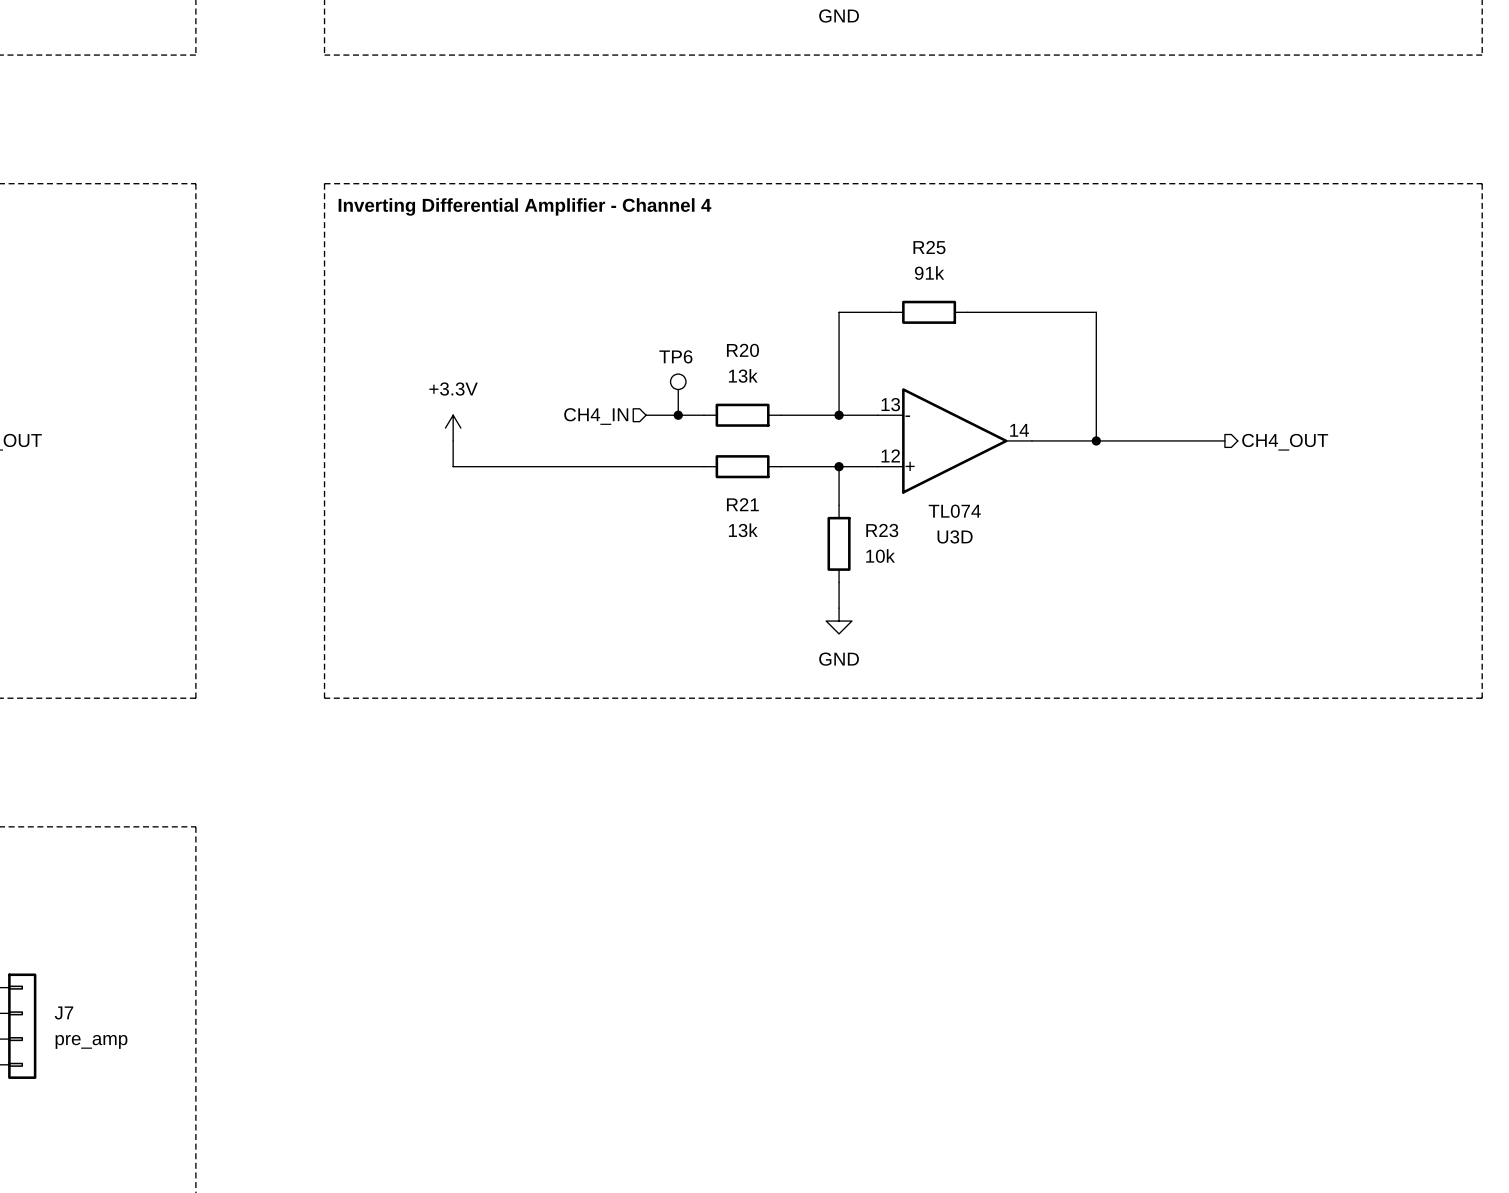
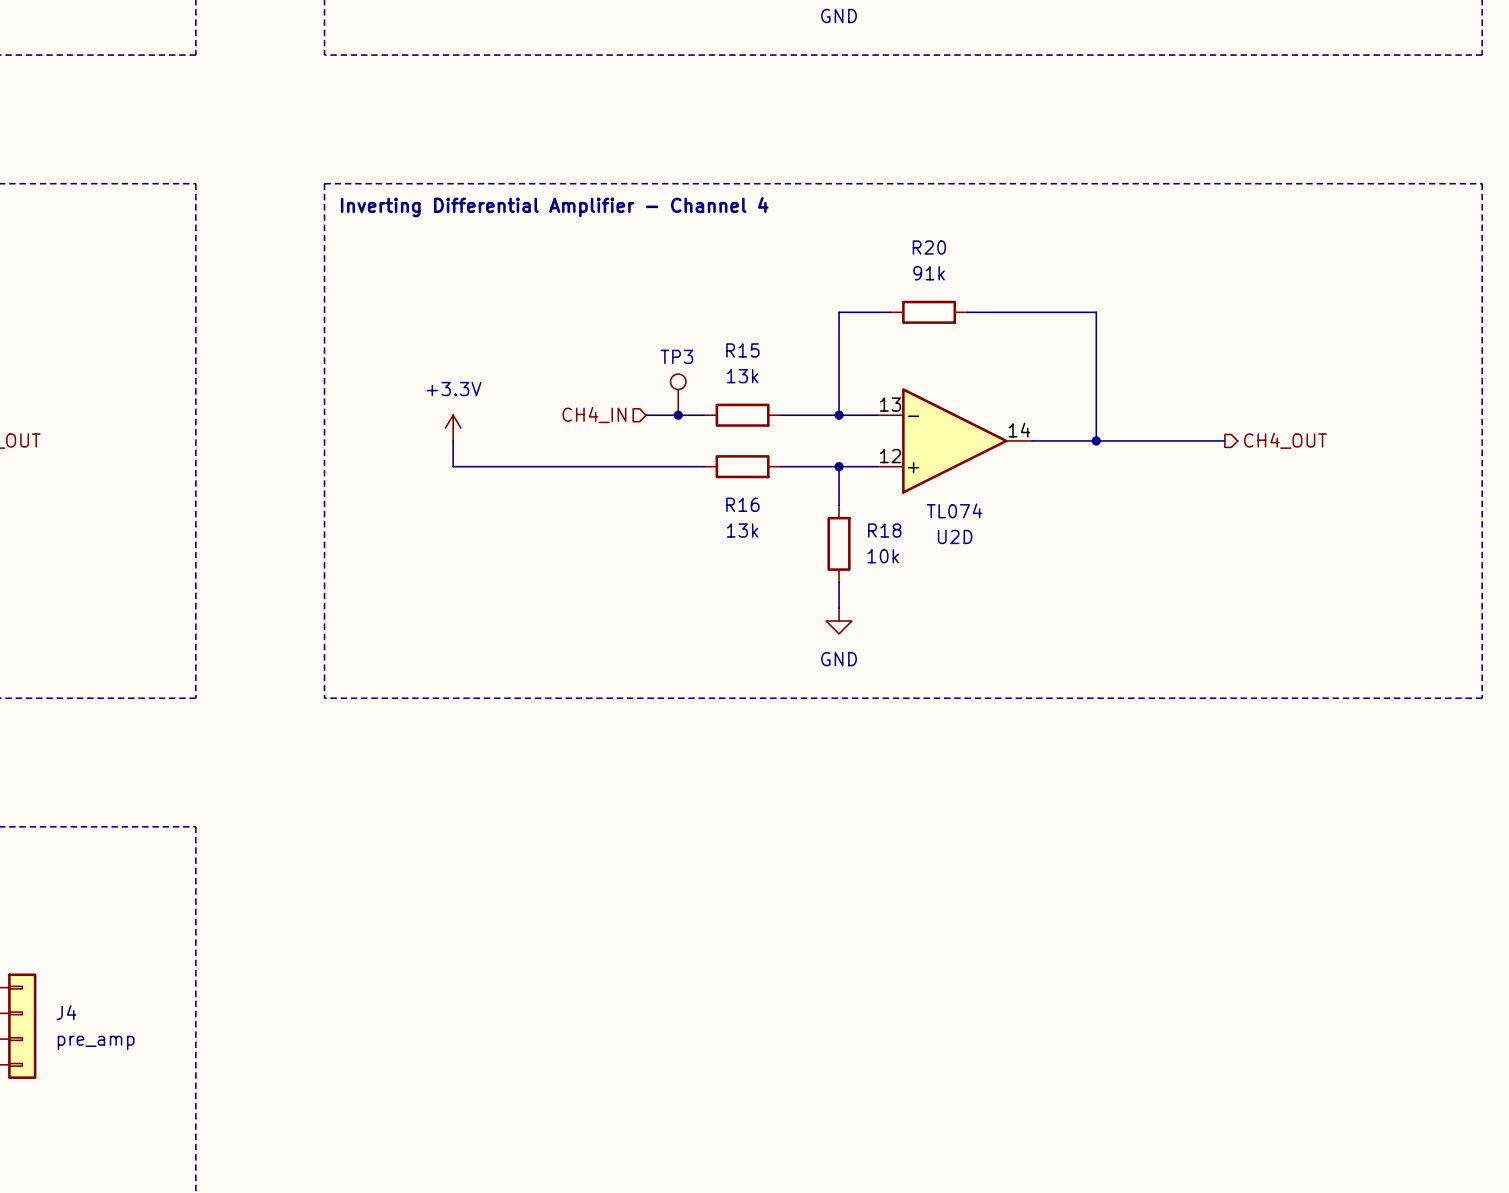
R25 name: R25 (929, 247) -> R20 (929, 247)
R20 name: R20 (742, 350) -> R15 (742, 350)
TP6 name: TP6 (675, 356) -> TP3 (676, 356)
R21 name: R21 (742, 504) -> R16 (742, 504)
R23 name: R23 (882, 530) -> R18 (884, 530)
U3D name: U3D (955, 536) -> U2D (955, 536)
J7 name: J7 (63, 1012) -> J4 (66, 1012)

